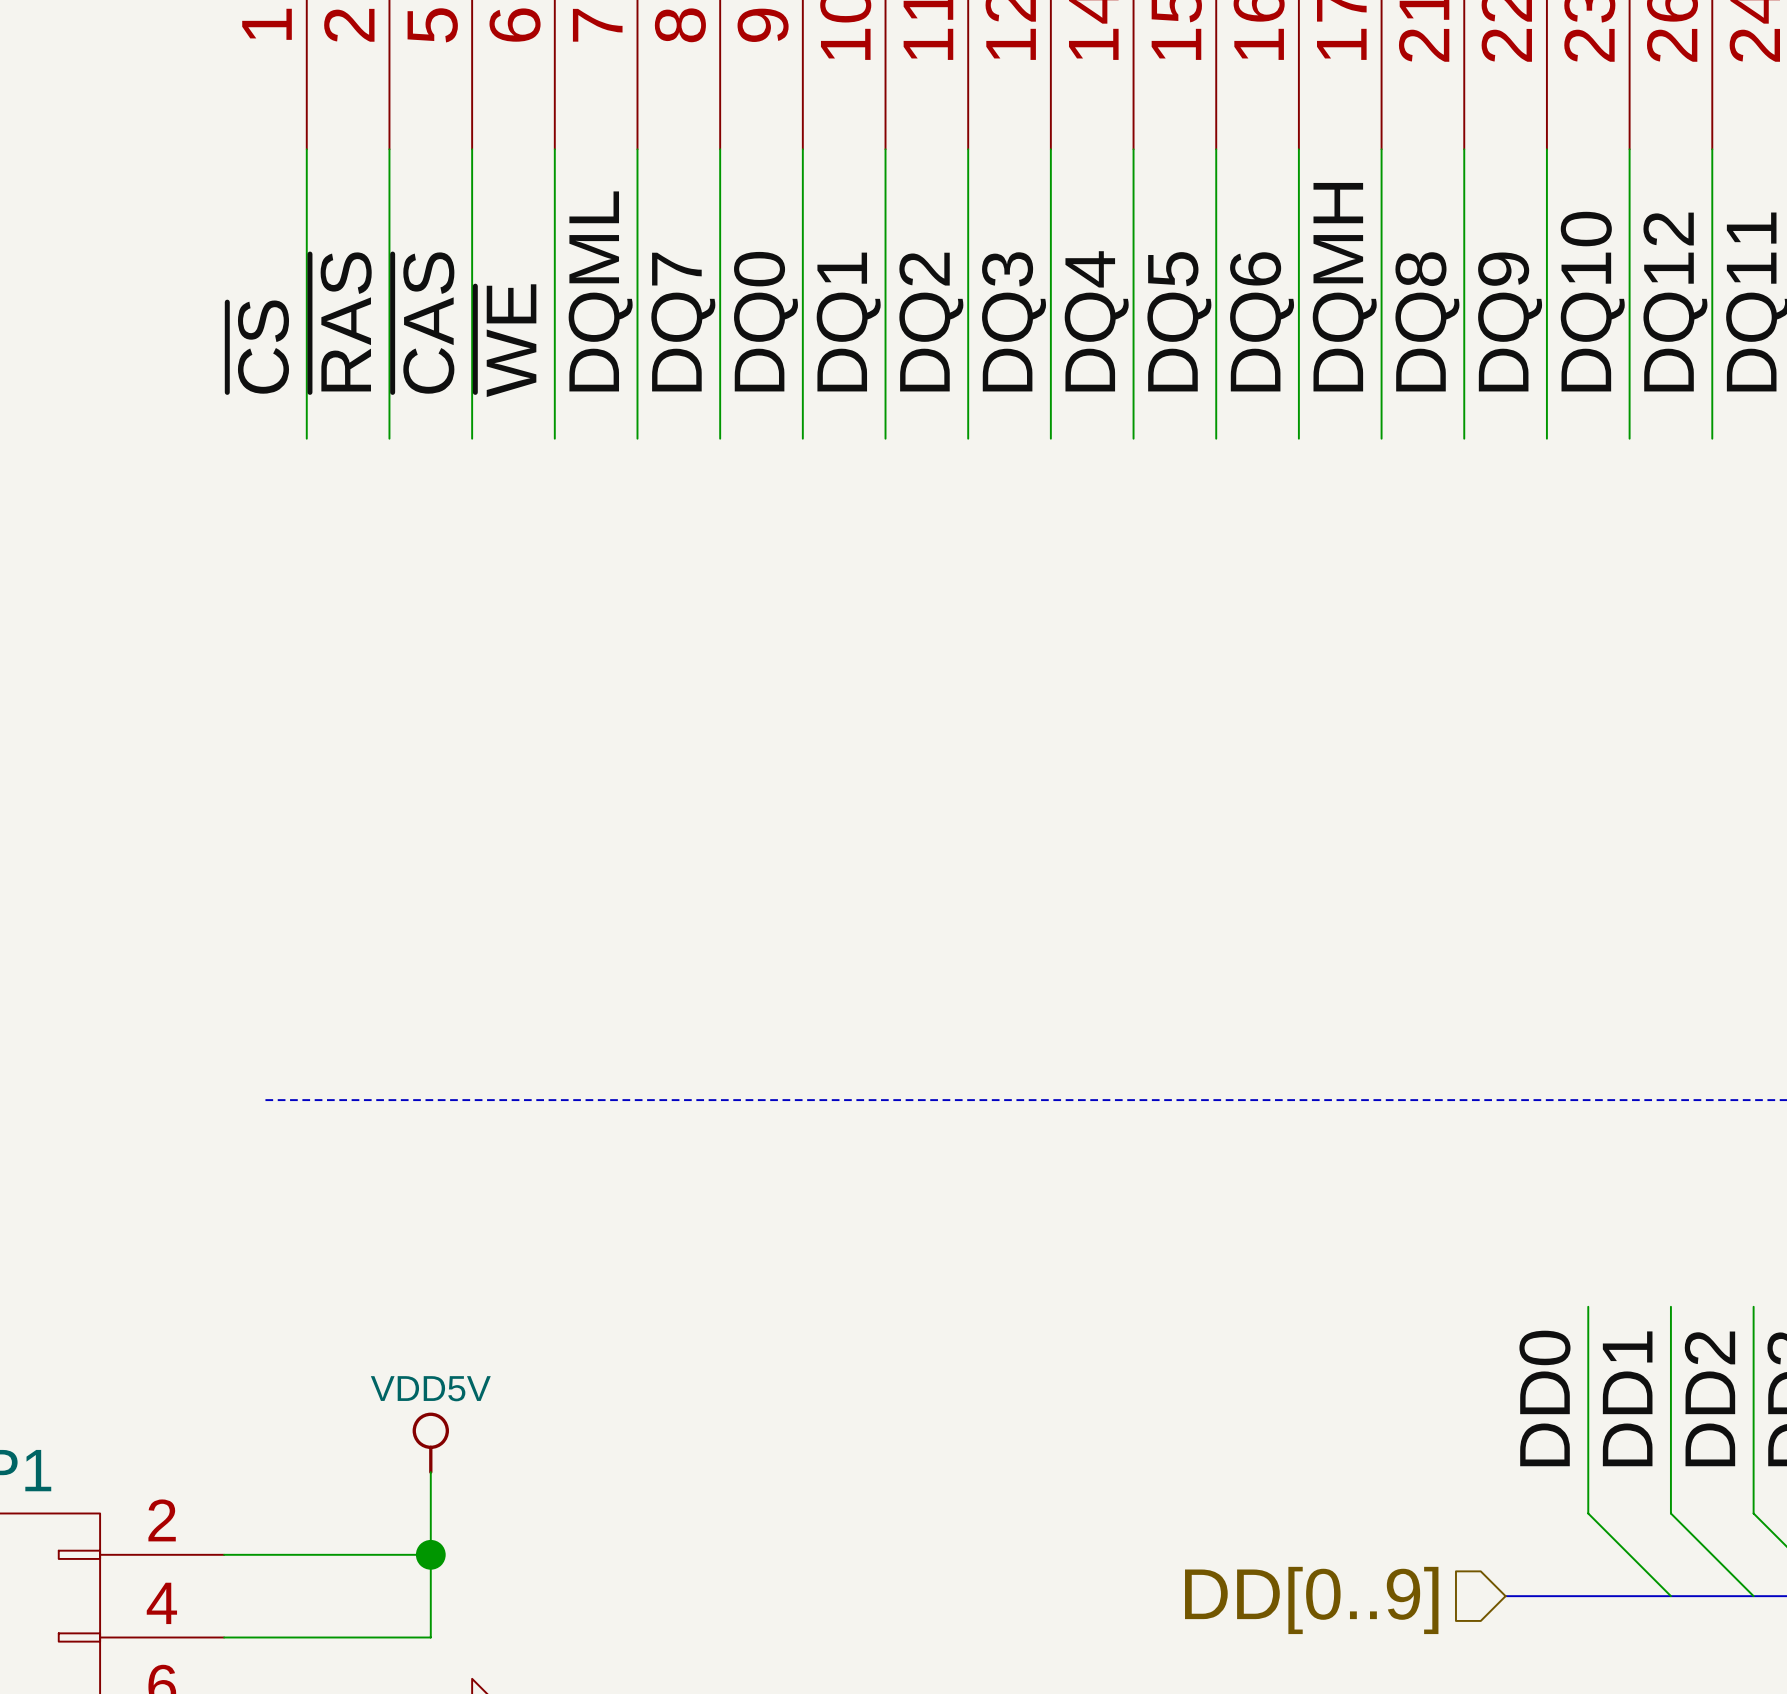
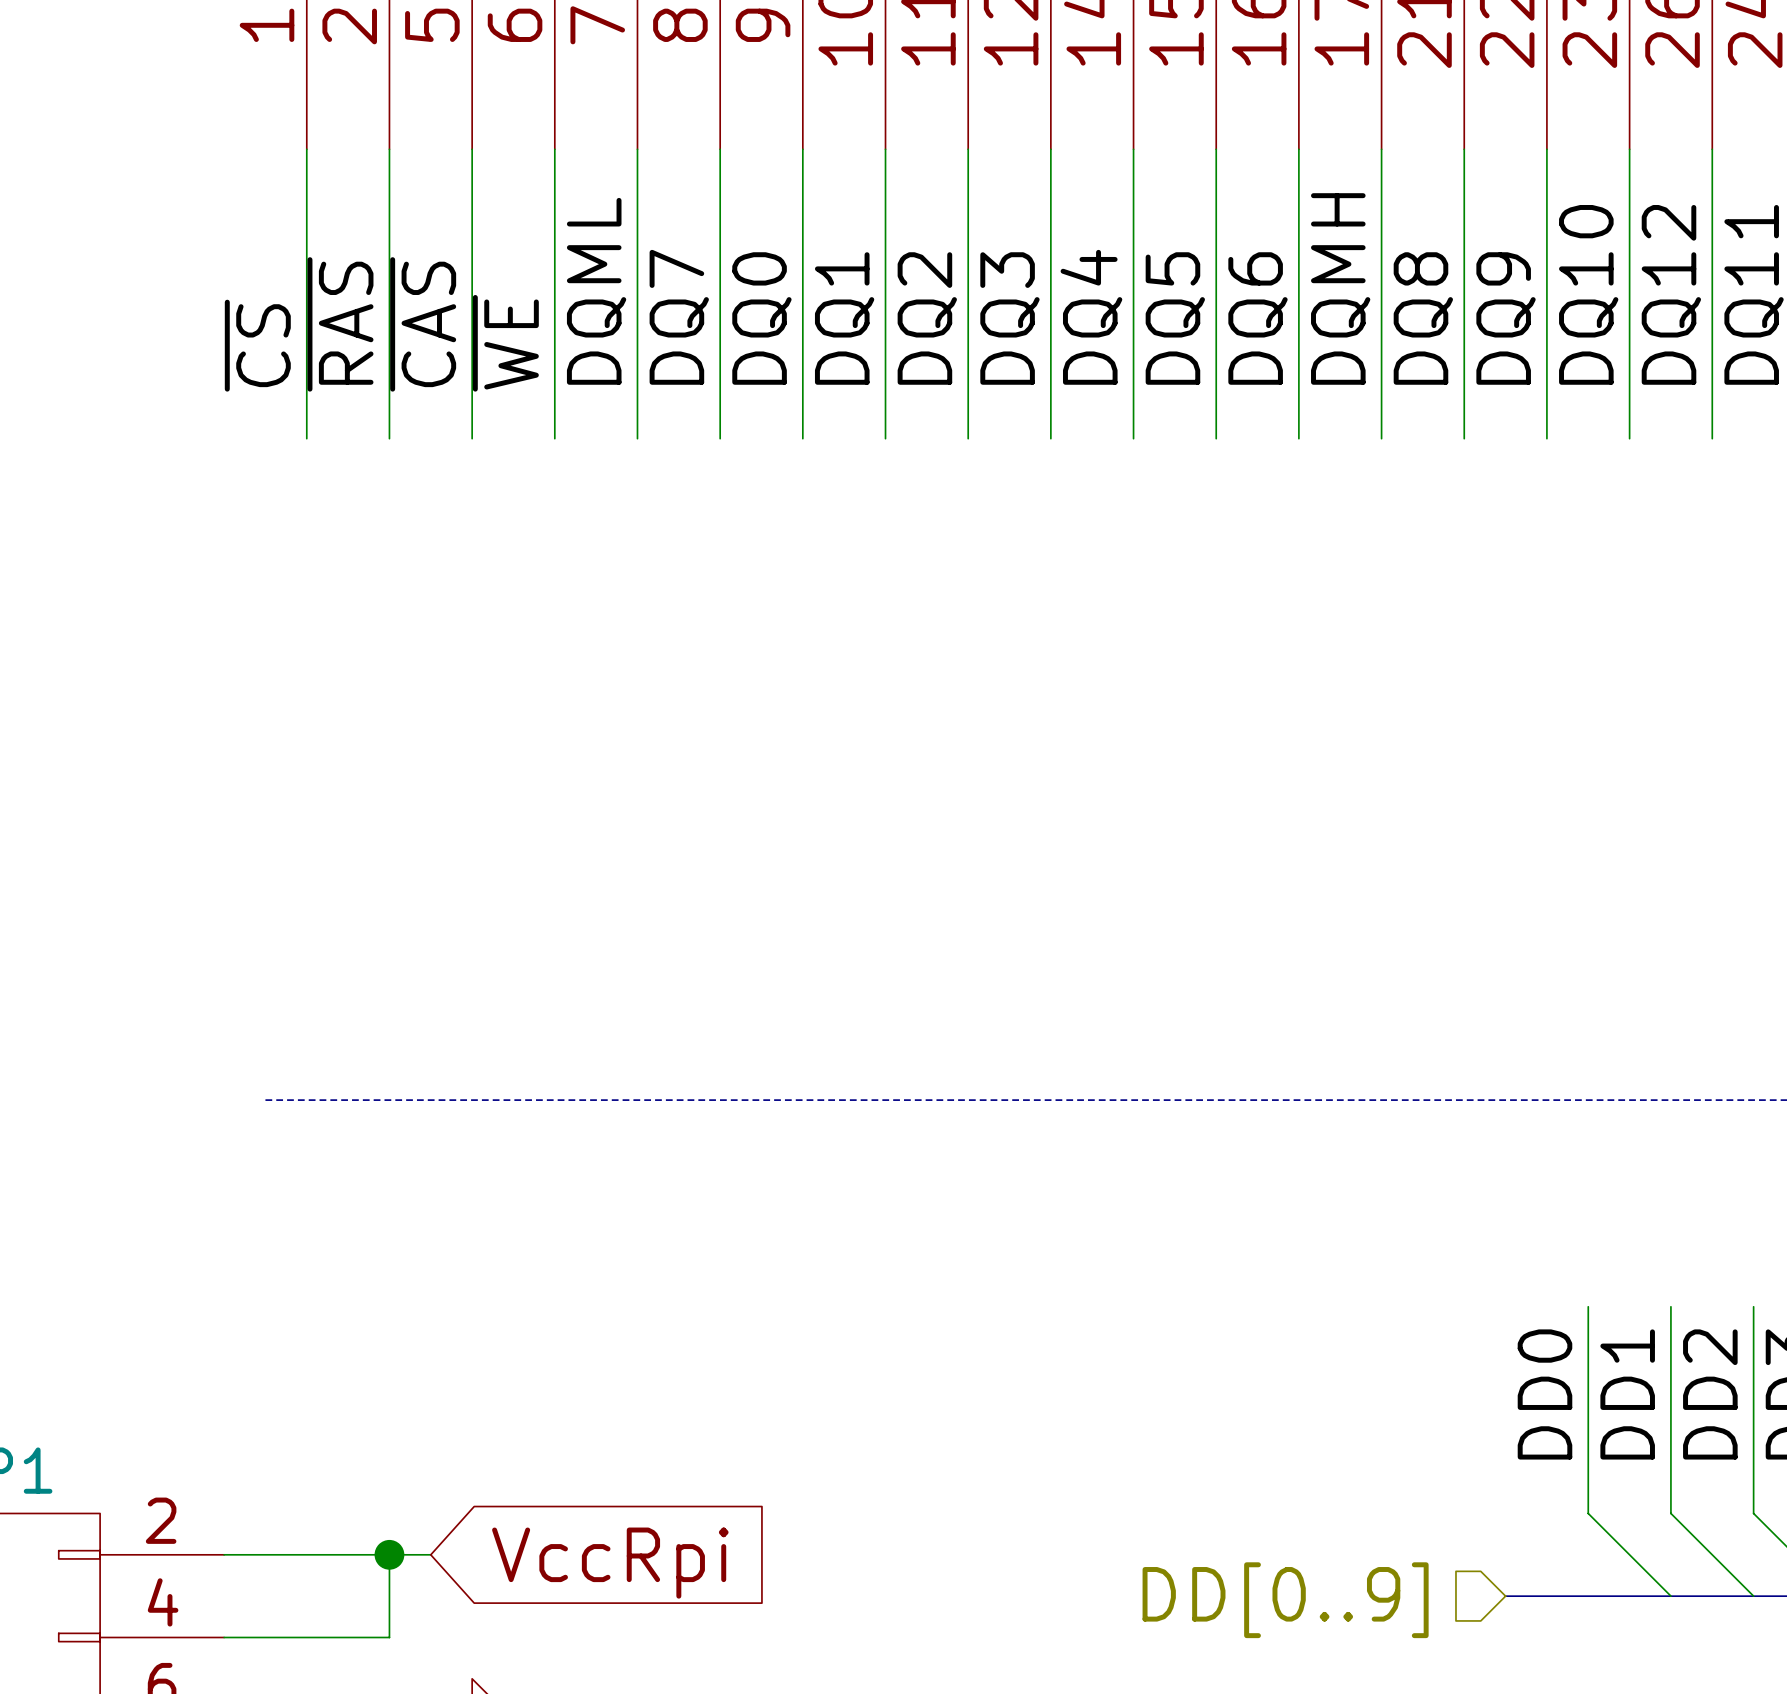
power symbol: VDD5V (430, 1443) -> none
wire: (430, 1472) (430, 1637) (389, 1637) -> (389, 1554) (389, 1637)
junction position: (430, 1554) -> (389, 1554)
global label: none -> VccRpi (610, 1563)

